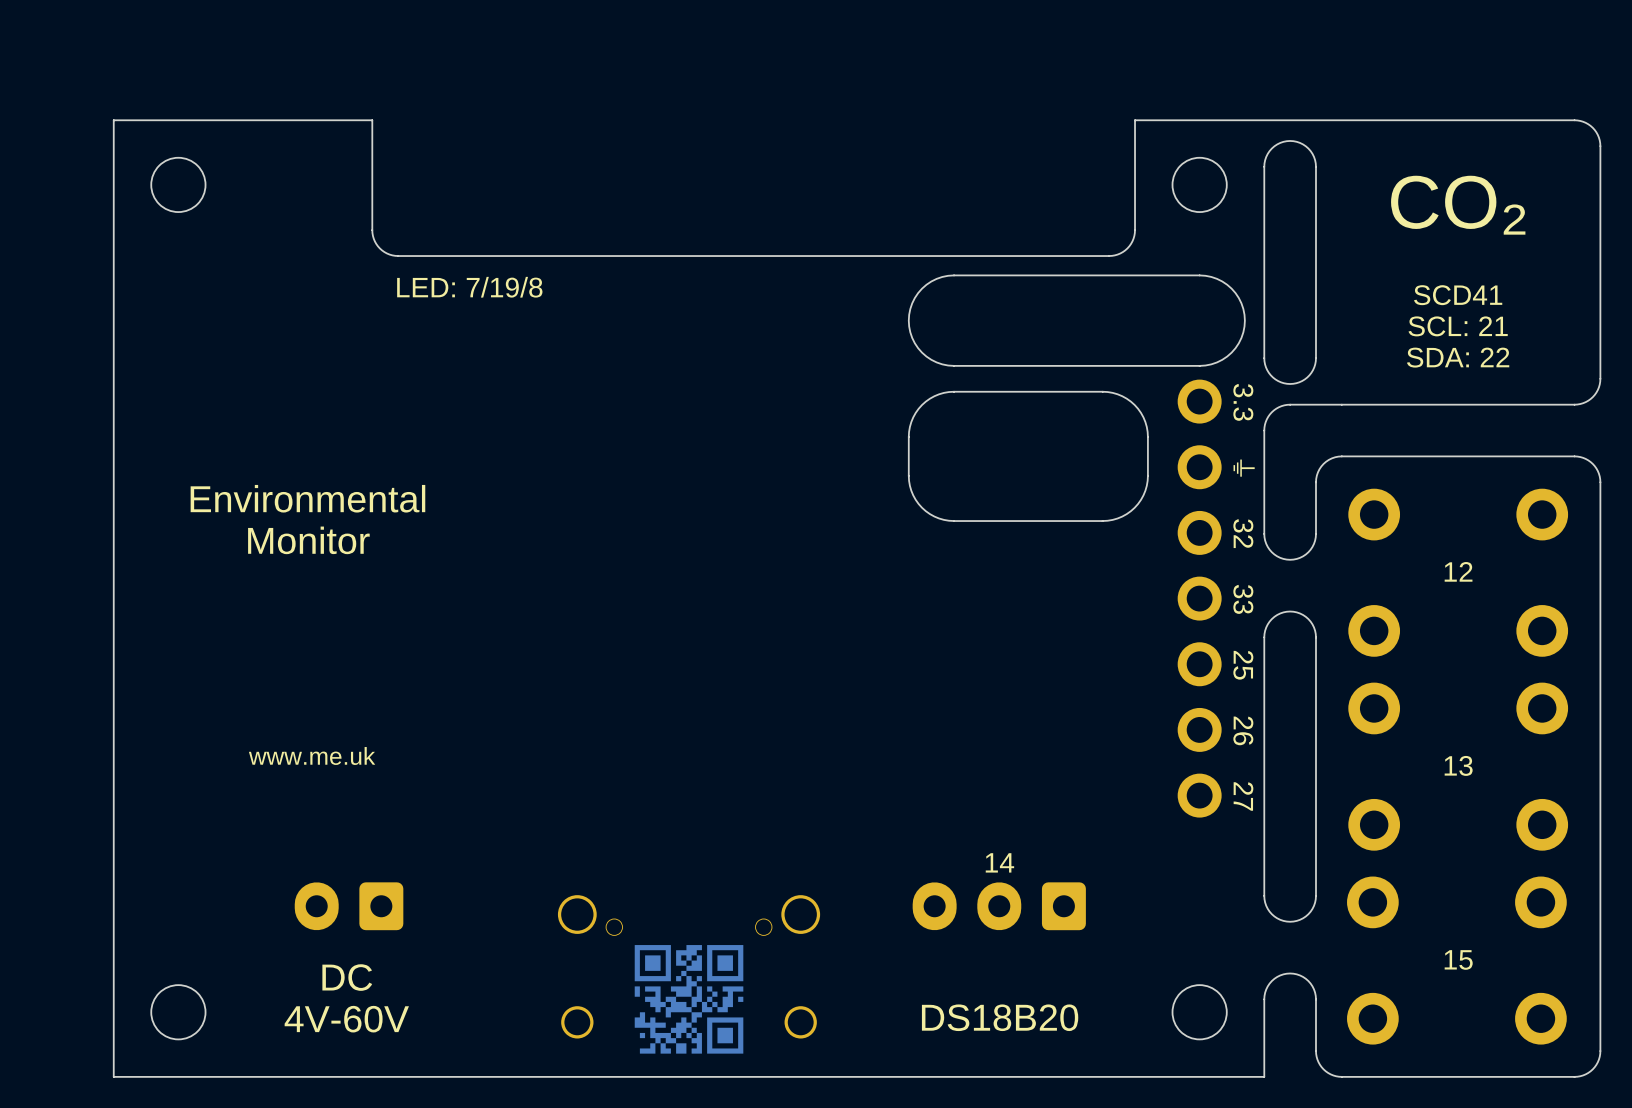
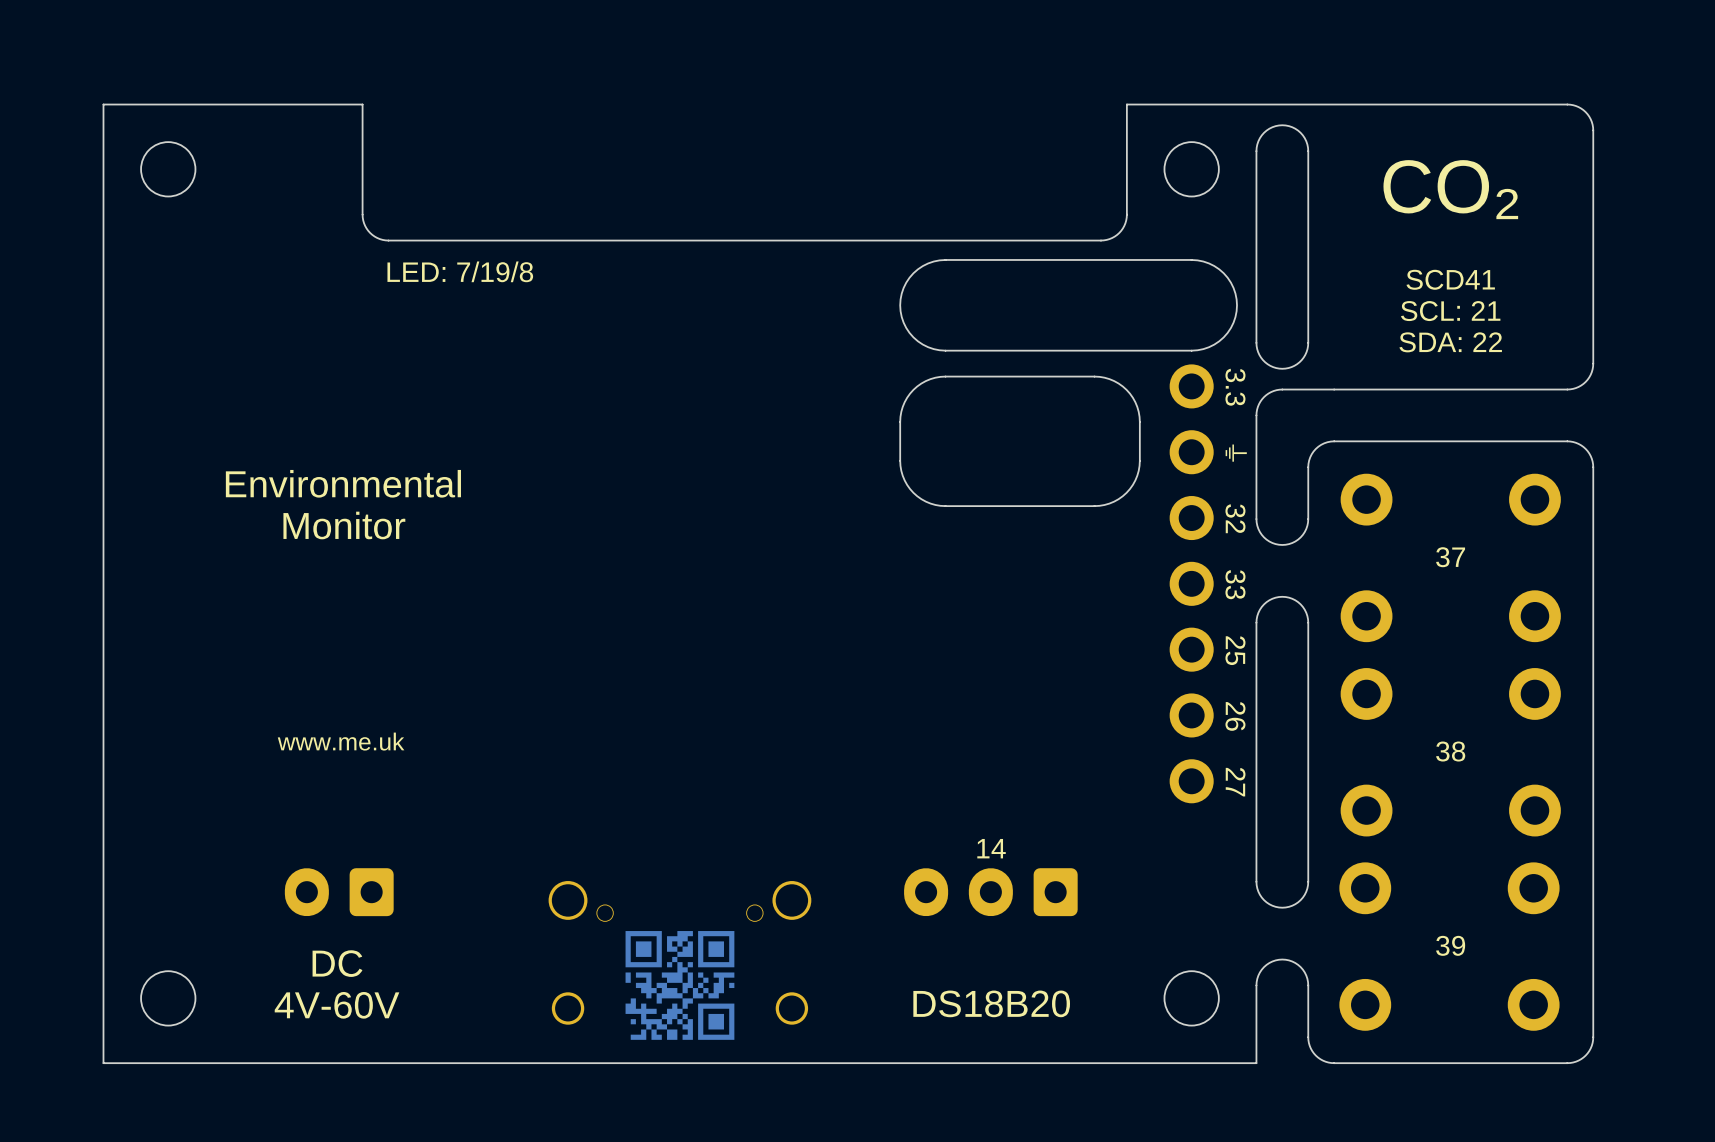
text position: Environmental (307, 498) -> Environmental (343, 483)
text position: Monitor (308, 540) -> Monitor (344, 525)
text: 12 (1458, 571) -> 37 (1450, 557)
drawing position: (312, 755) -> (341, 741)
text: 13 (1458, 765) -> 38 (1450, 751)
text: 15 (1458, 959) -> 39 (1450, 945)

